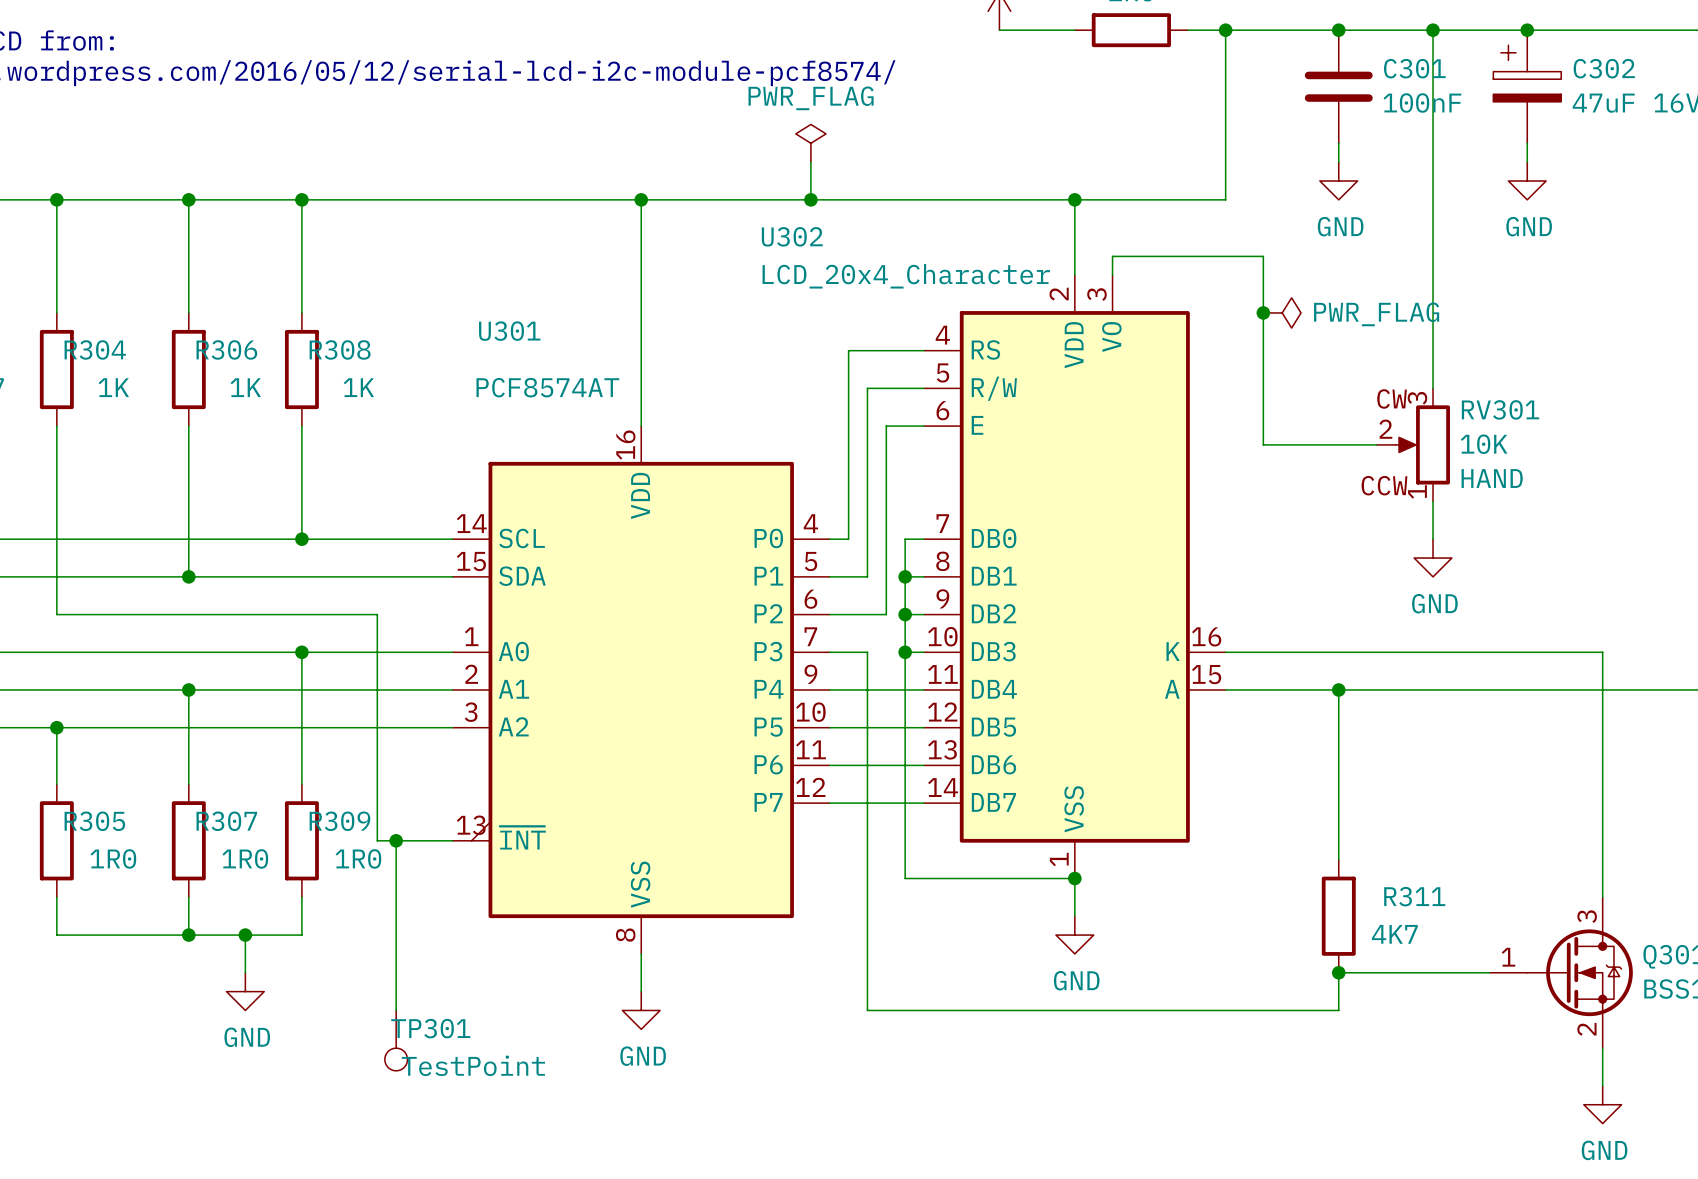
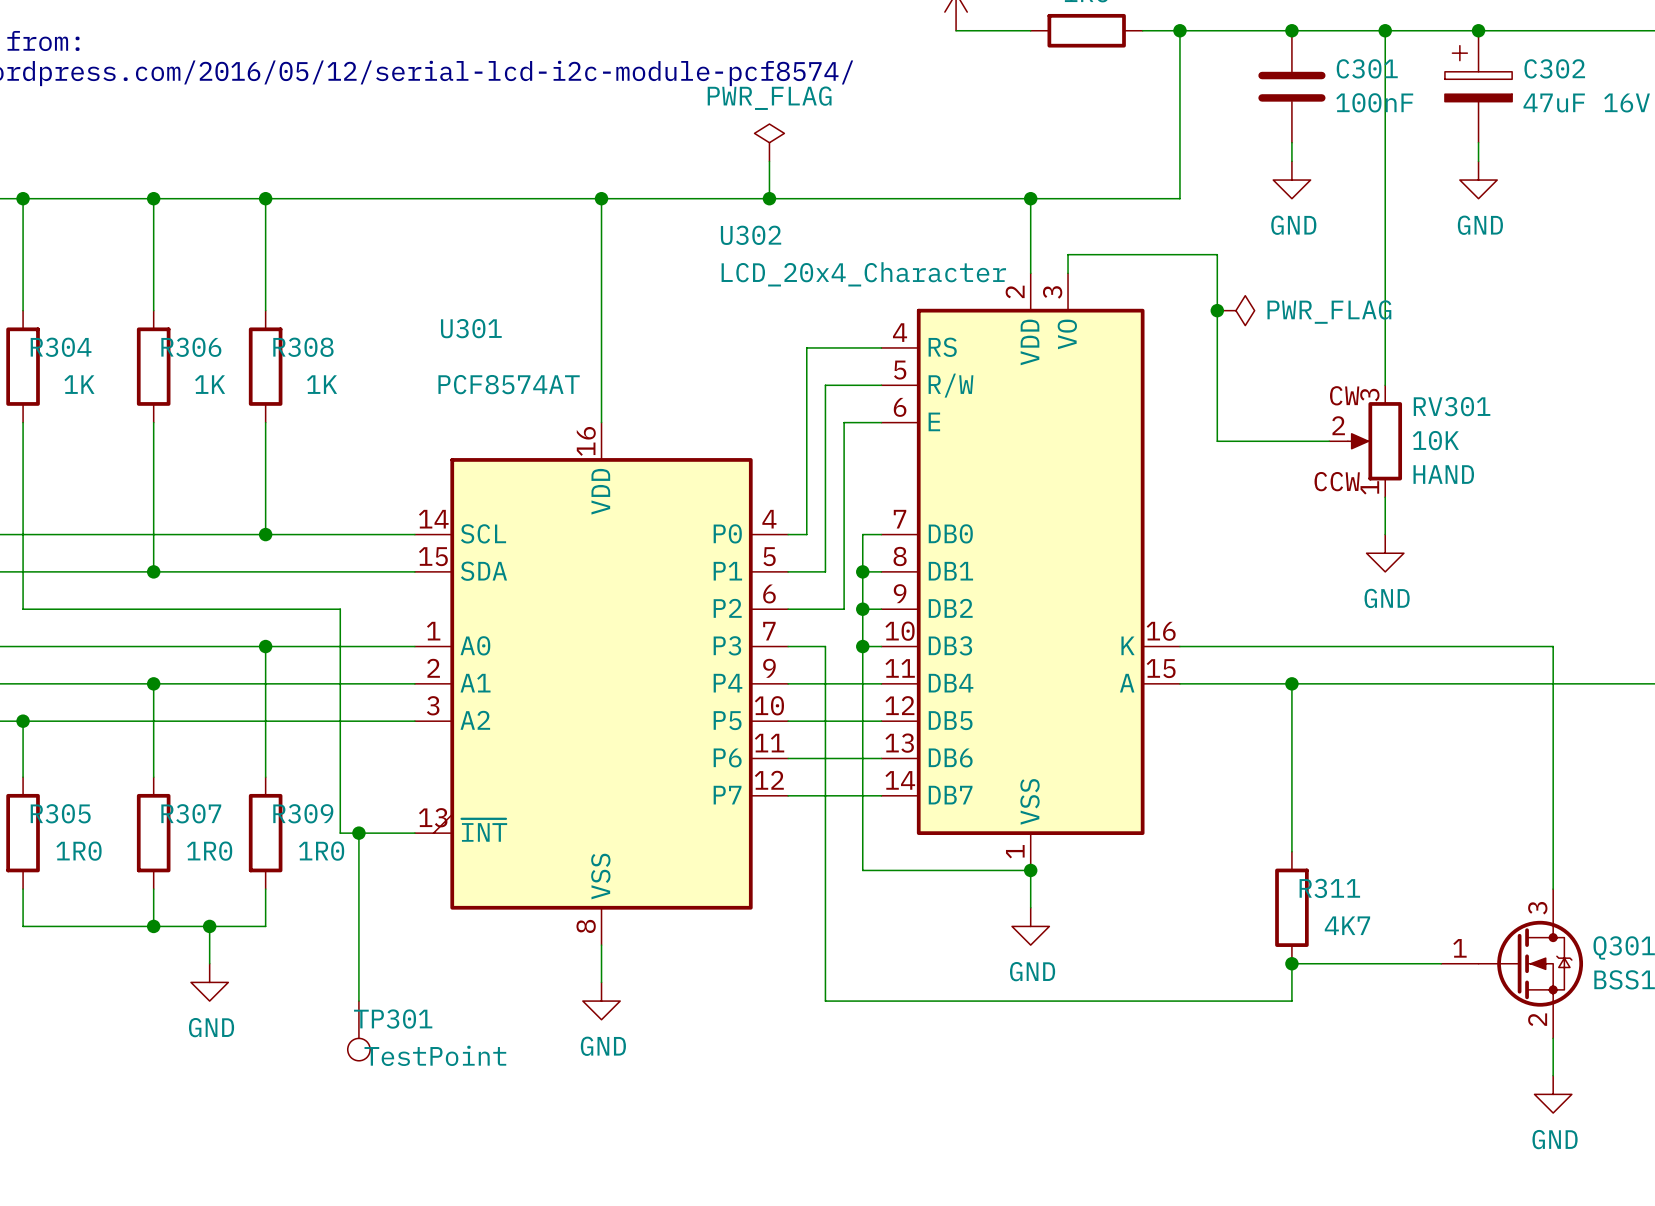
R311 name position: R311 (1414, 896) -> R311 (1329, 888)

